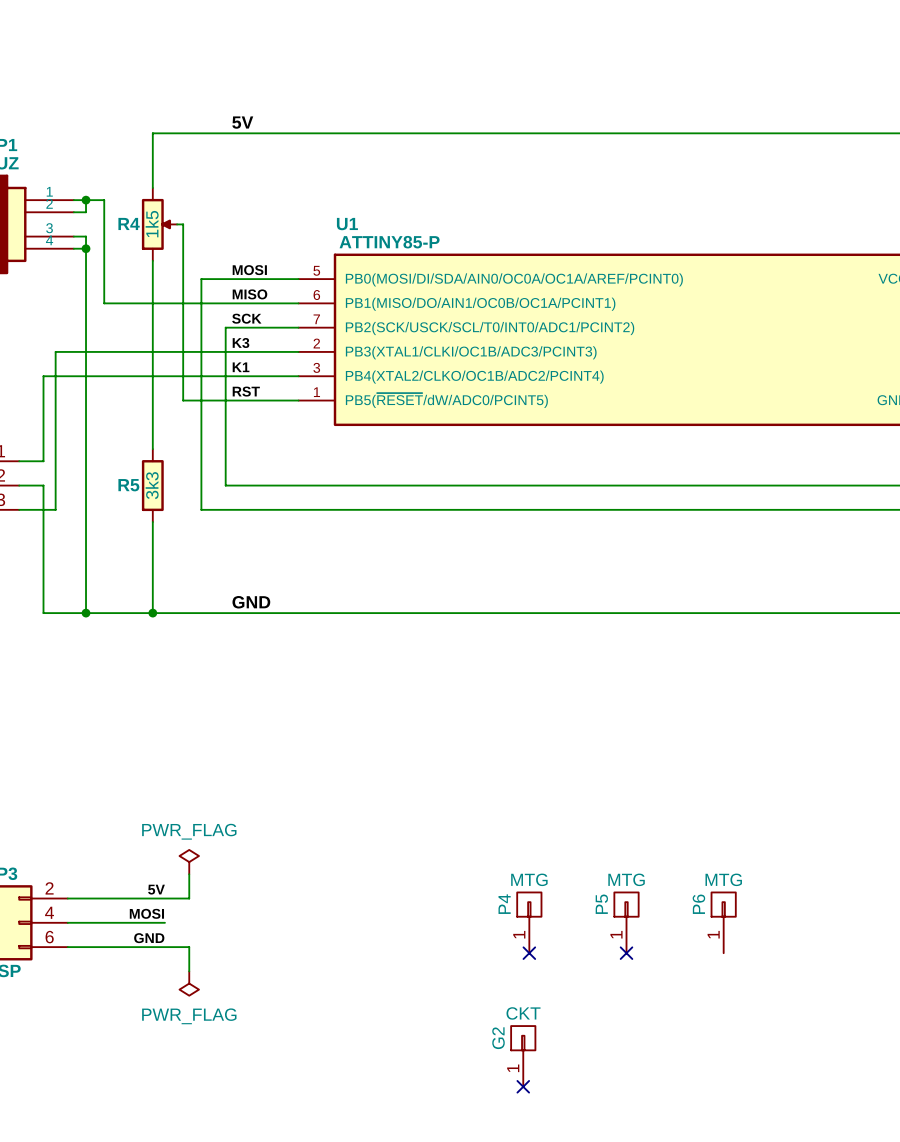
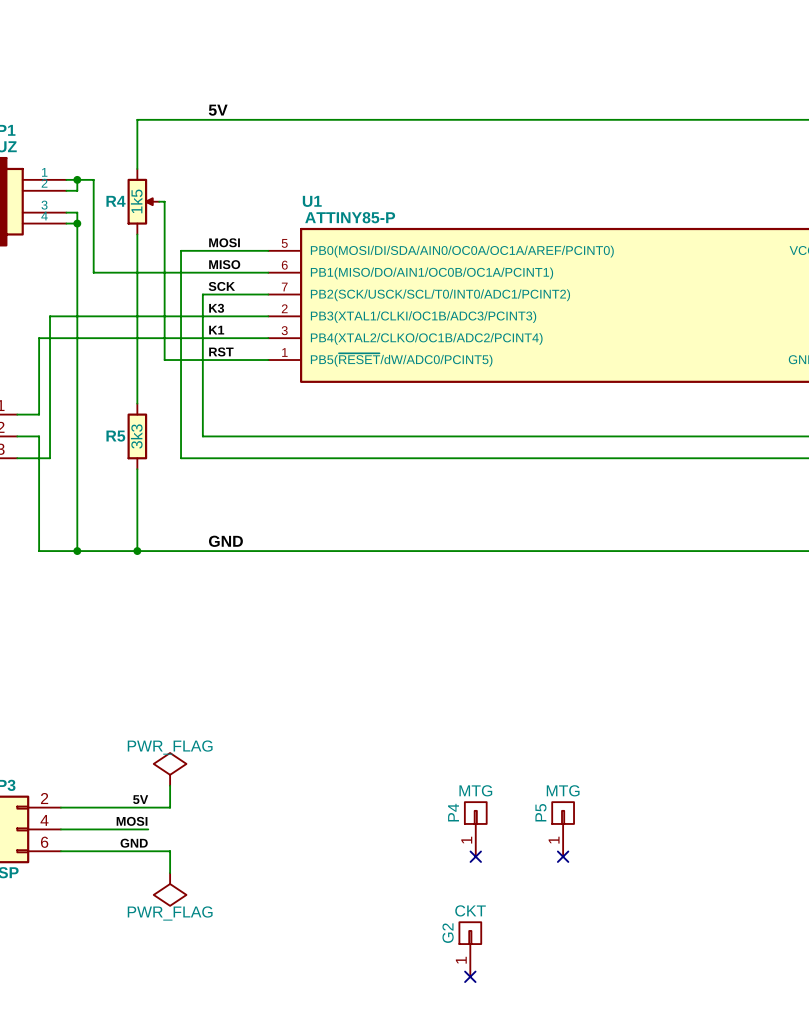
power symbol shape: [179, 849, 199, 875] -> [153, 753, 187, 786]
P6: MTG (723, 922) -> none
power symbol shape: [179, 971, 199, 996] -> [153, 873, 187, 906]

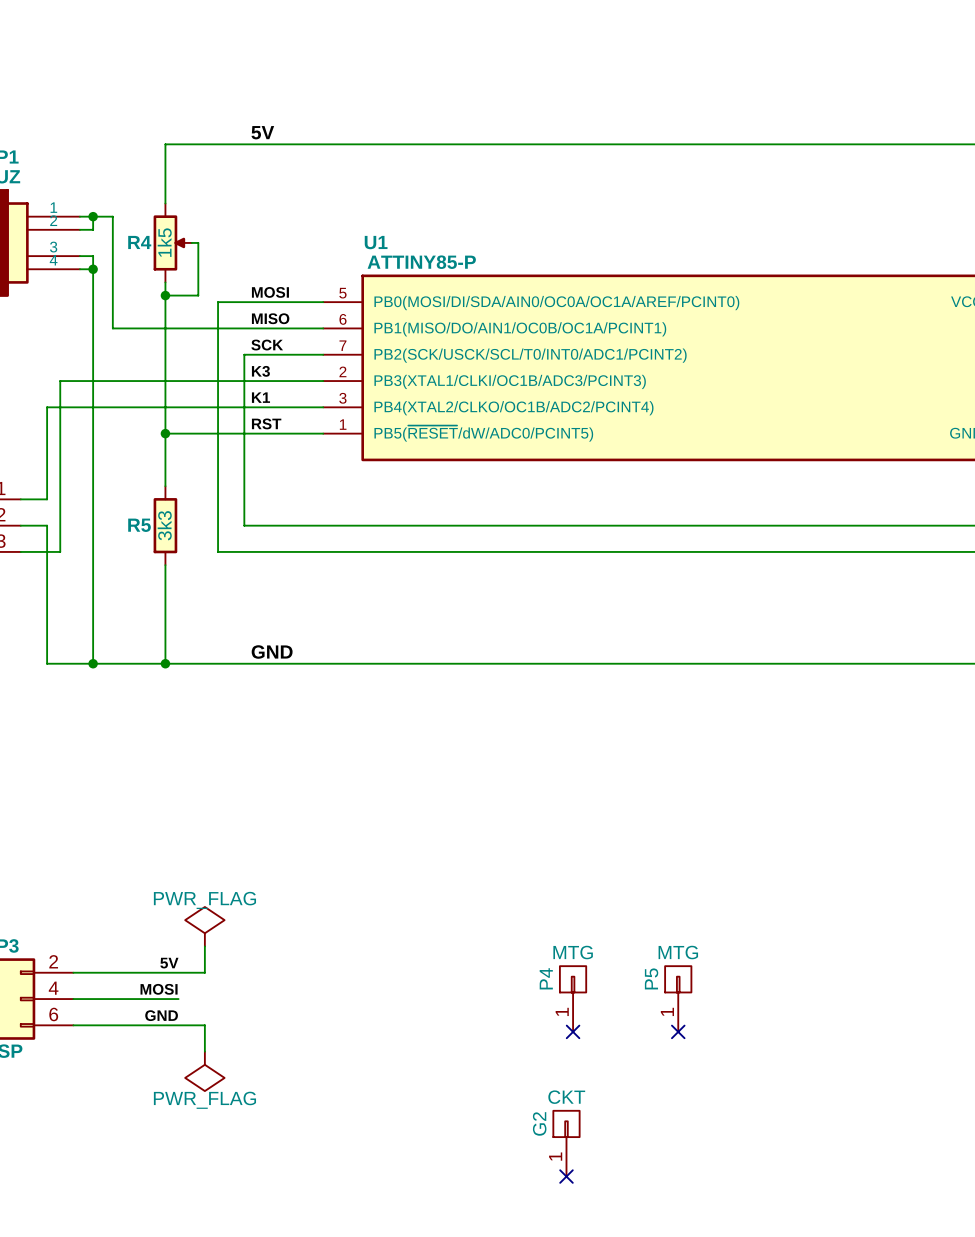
junction: none -> (165, 295)
wire: (164, 245) (164, 360) -> (198, 295) (165, 295)
wire: none -> (165, 433) (198, 433)
junction: none -> (165, 433)

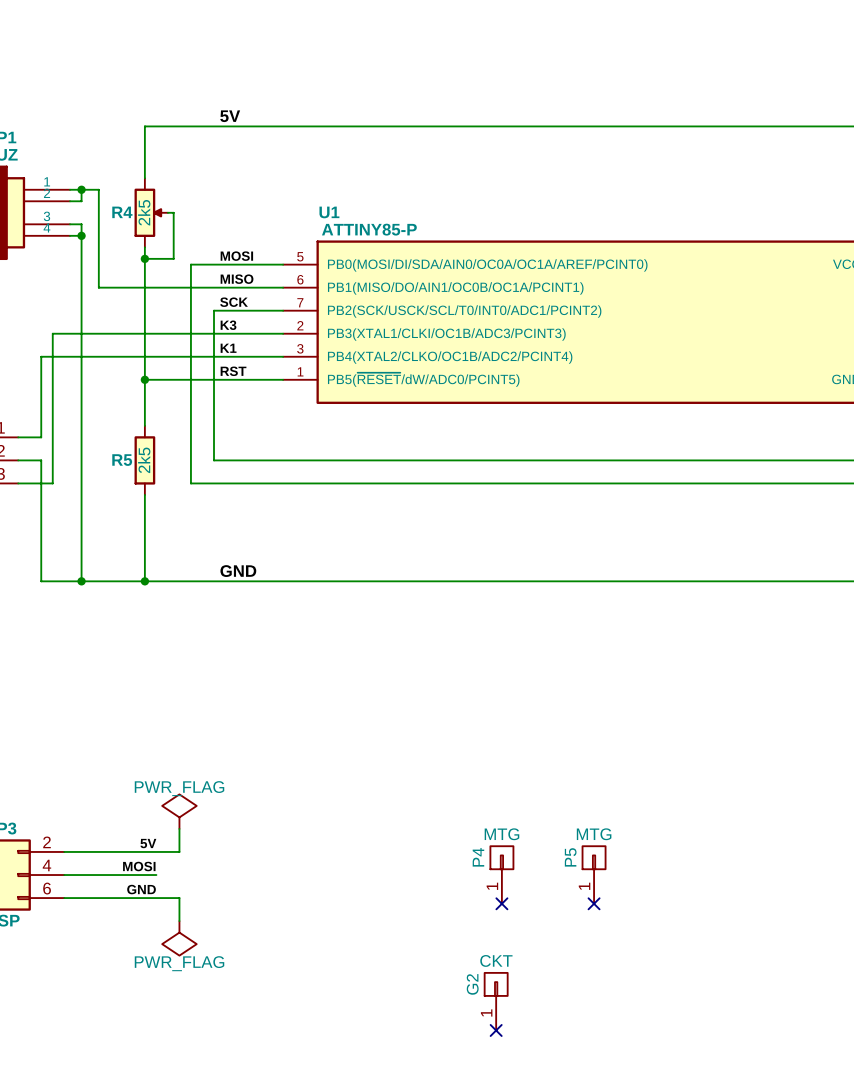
R4 value: 1k5 (164, 242) -> 2k5 (144, 212)
R5 value: 3k3 (164, 525) -> 2k5 (144, 460)

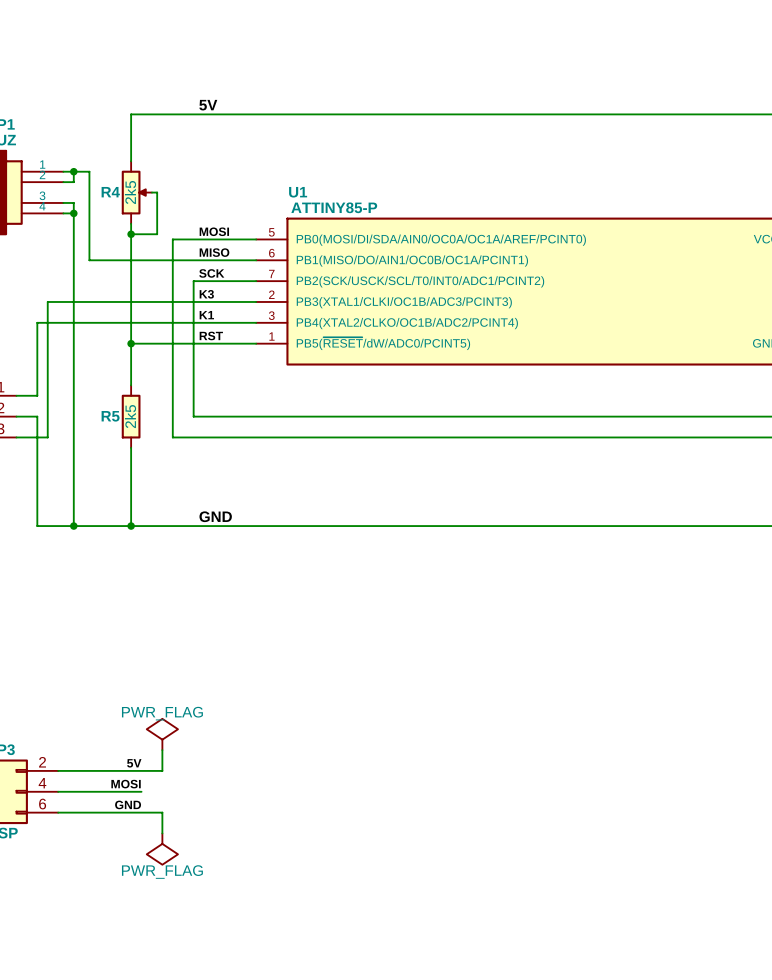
P4: MTG (501, 875) -> none
P5: MTG (594, 875) -> none
no-connect mark: (501, 903) -> none
no-connect mark: (594, 903) -> none
G2: CKT (496, 1001) -> none
no-connect mark: (496, 1030) -> none

